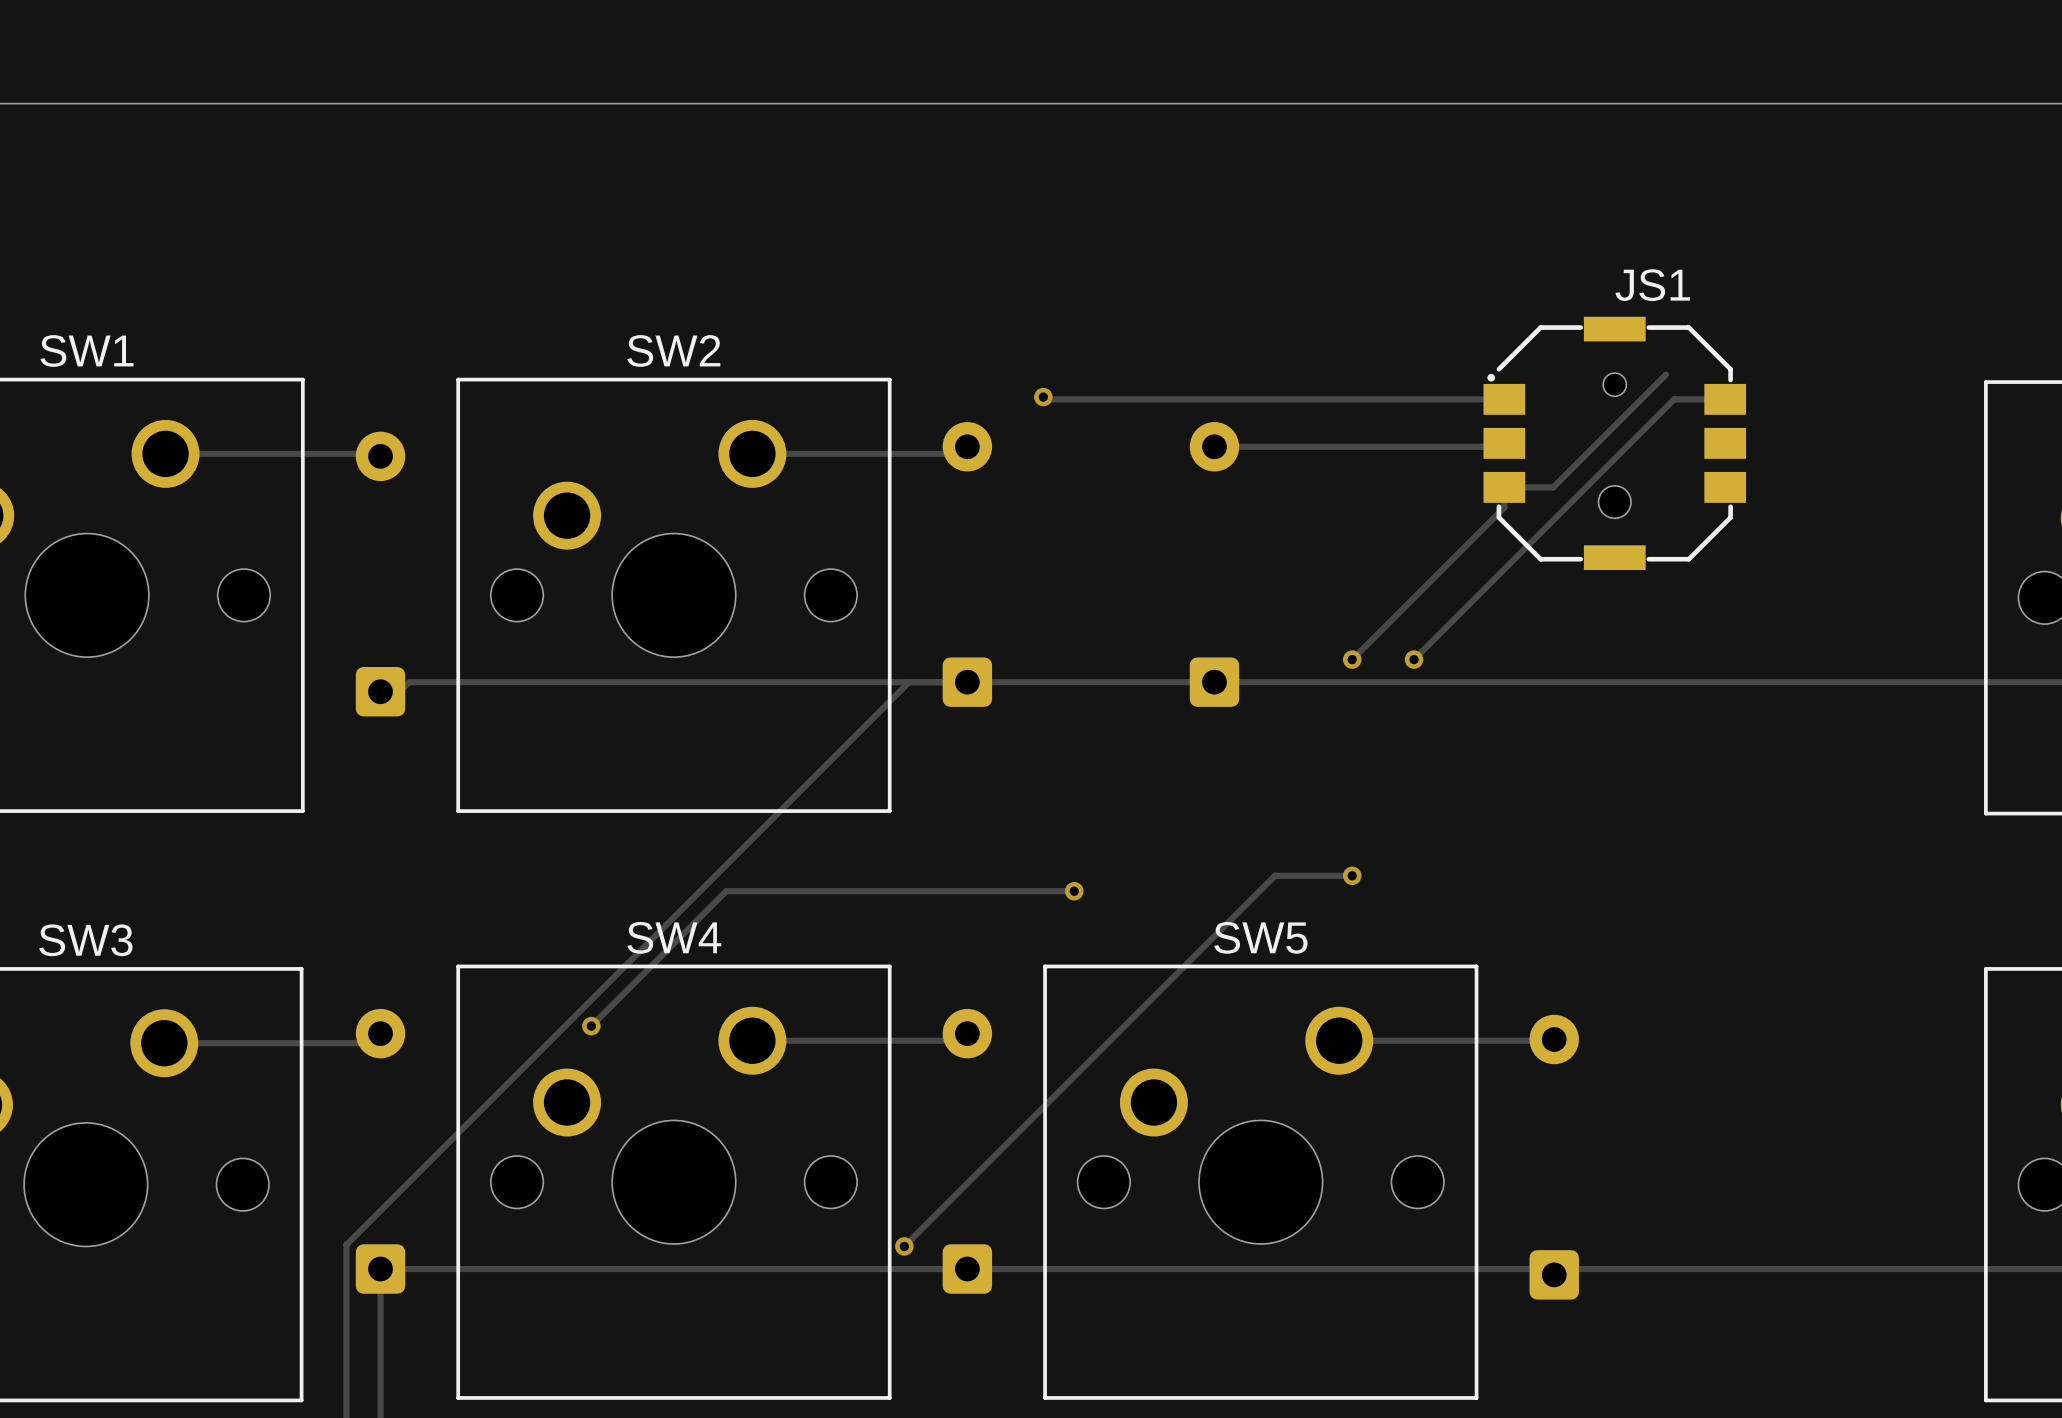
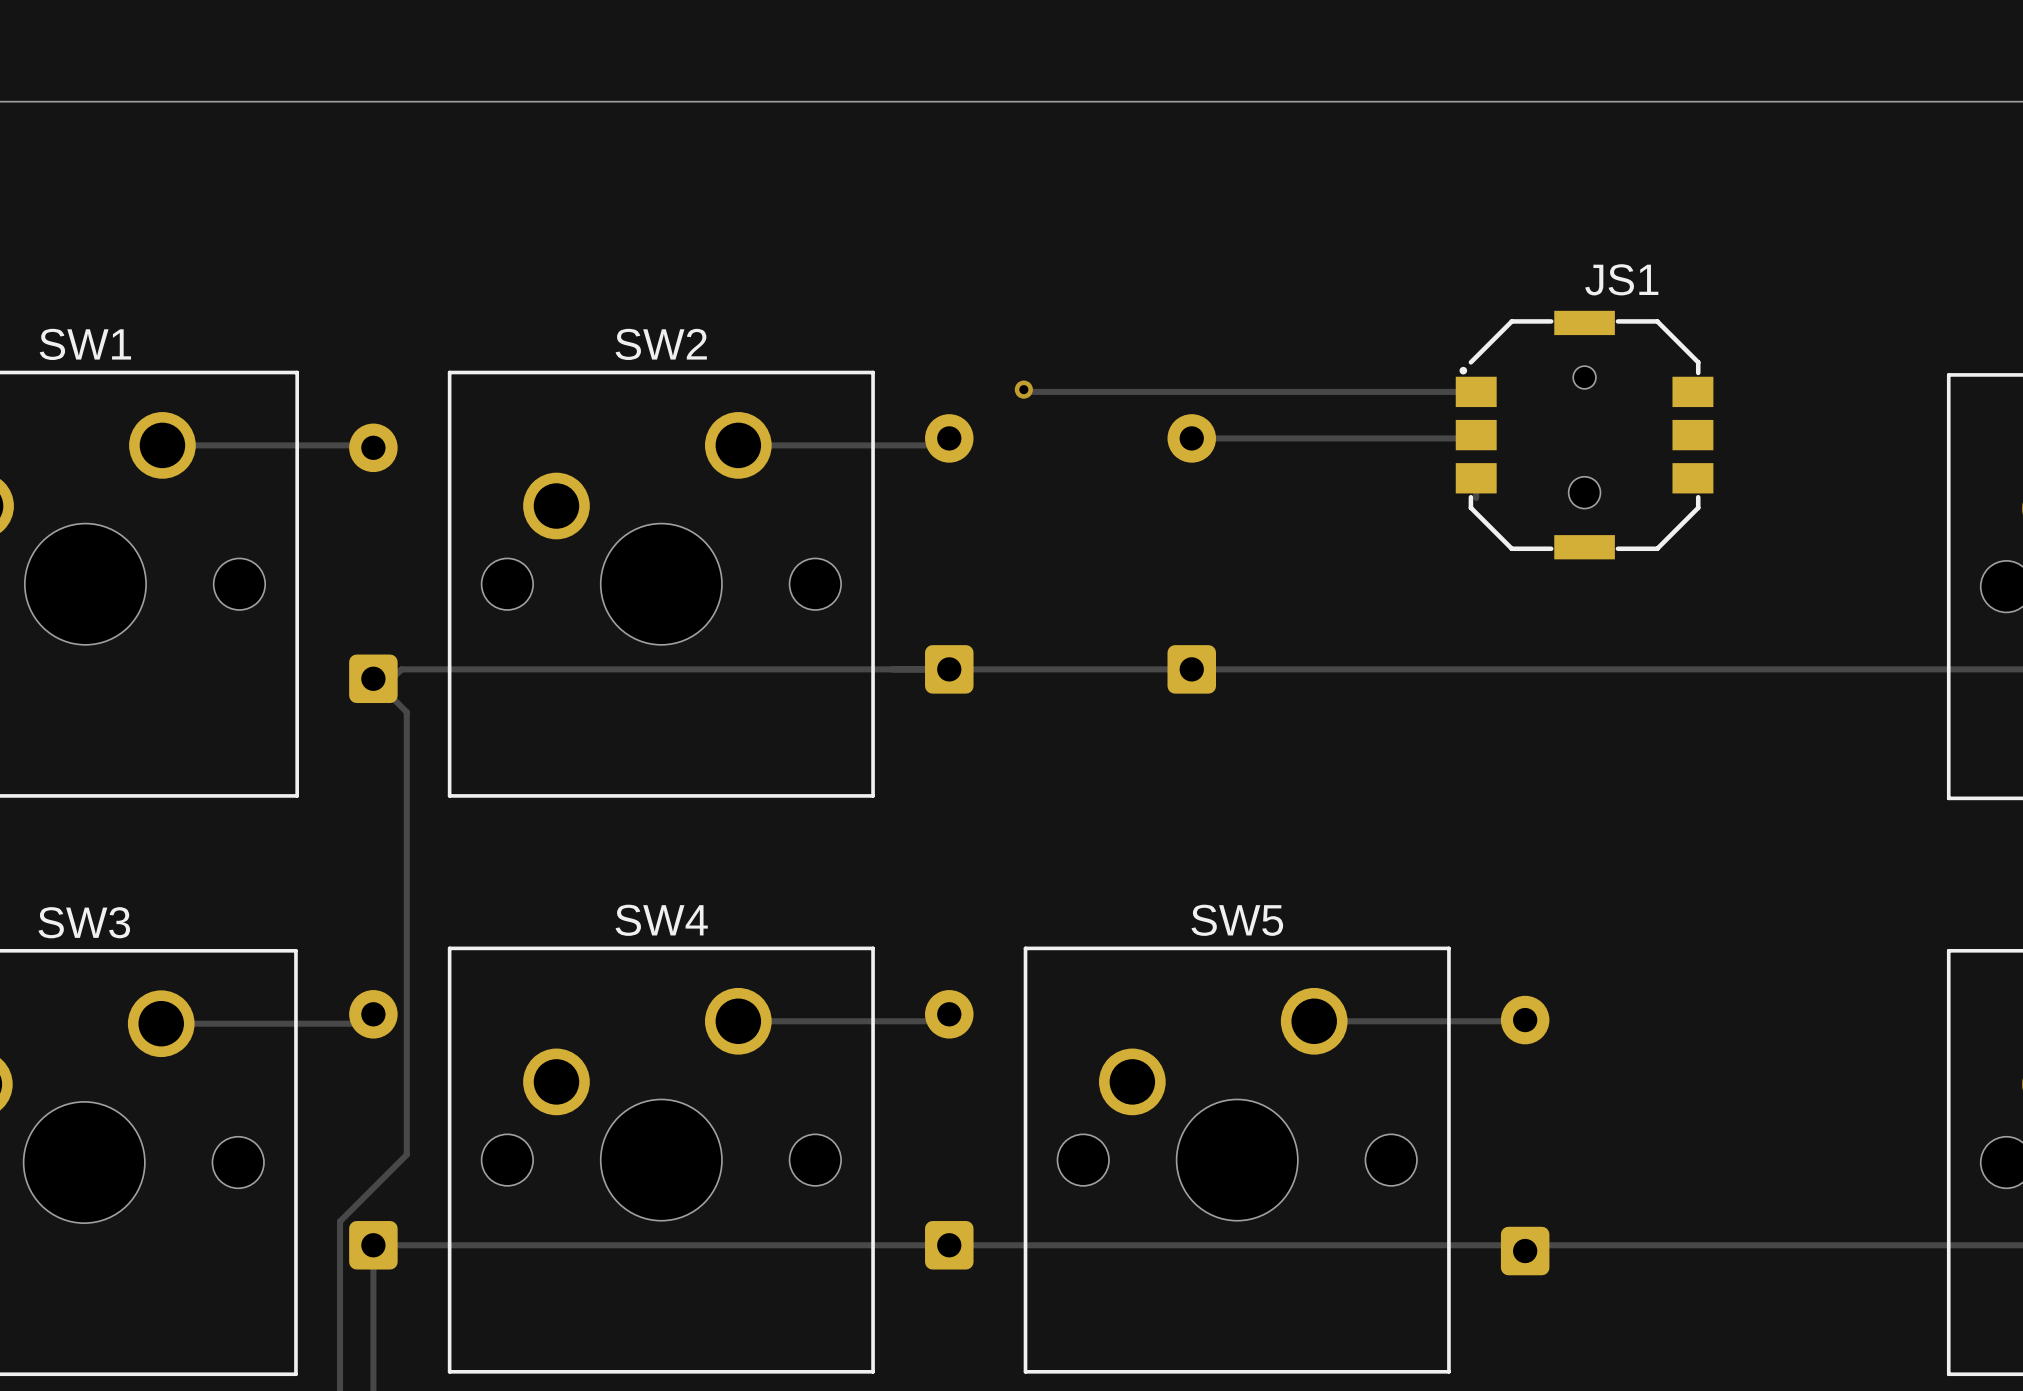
track: (1666, 374) (1553, 487) (1504, 487) -> none
track: (1725, 399) (1674, 399) (1414, 659) -> none
track: (1504, 507) (1352, 659) -> none
via: (1352, 659) -> none
via: (1414, 659) -> none
track: (909, 682) (414, 1176) -> (373, 678) (406, 712) (406, 1154)
track: (1352, 875) (1275, 875) (904, 1246) -> none
via: (1352, 875) -> none
track: (1074, 891) (726, 891) (591, 1026) -> none
via: (1074, 891) -> none
via: (591, 1026) -> none
via: (904, 1246) -> none

